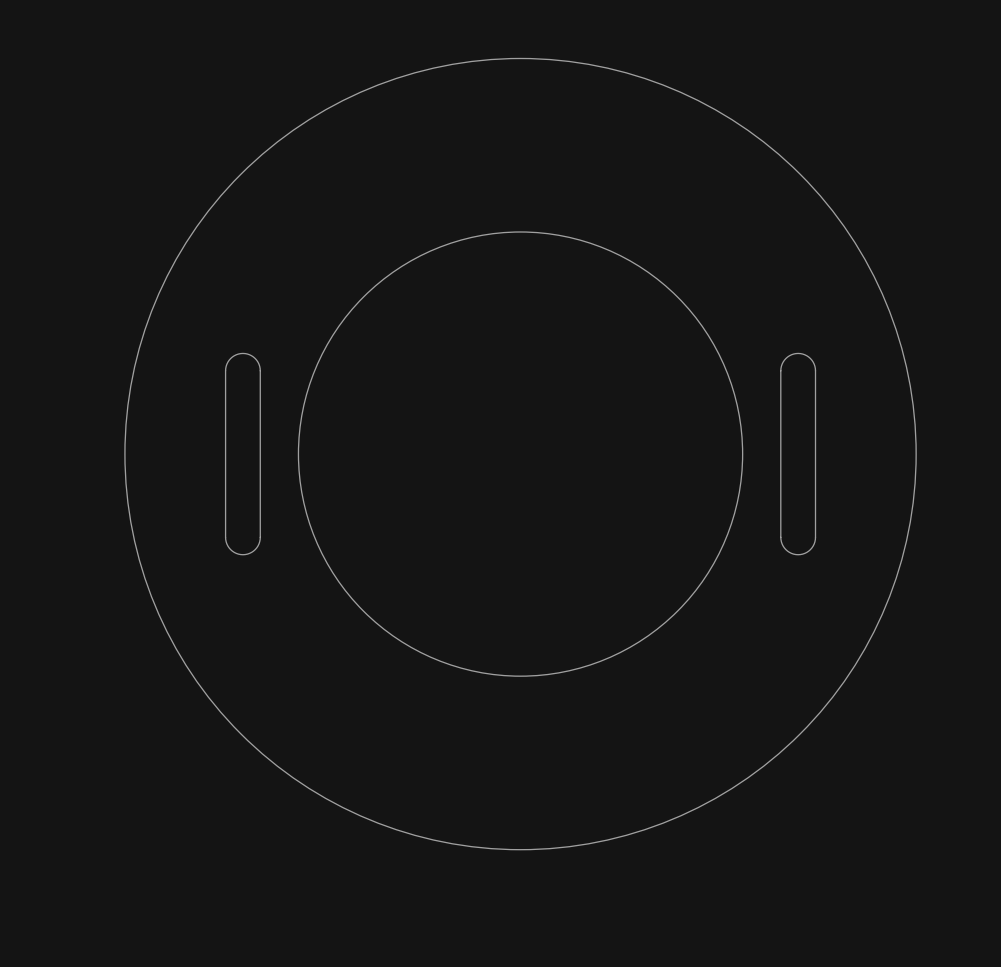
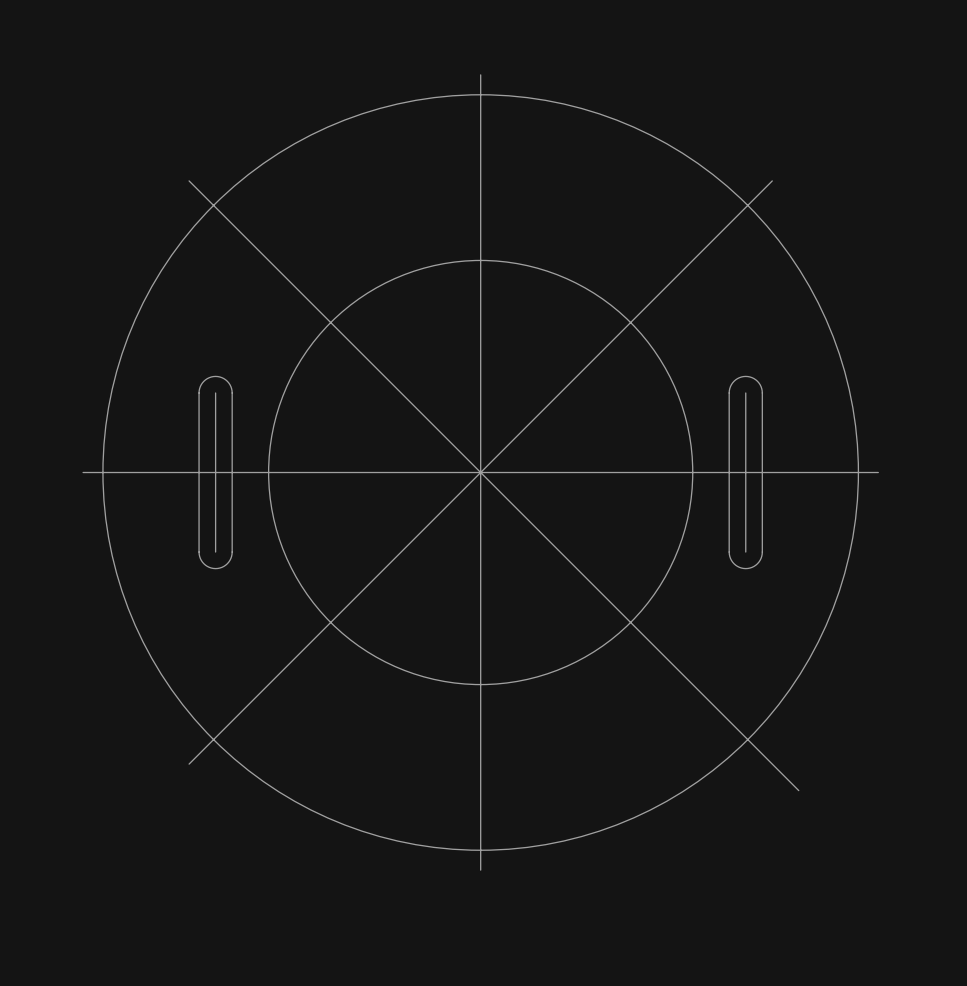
board edge: none -> (480, 74) (480, 870)
board edge: none -> (189, 180) (798, 790)
board edge: none -> (772, 180) (189, 764)
board edge: none -> (215, 392) (215, 552)
board edge: none -> (745, 392) (745, 552)
board edge: none -> (83, 472) (878, 472)

